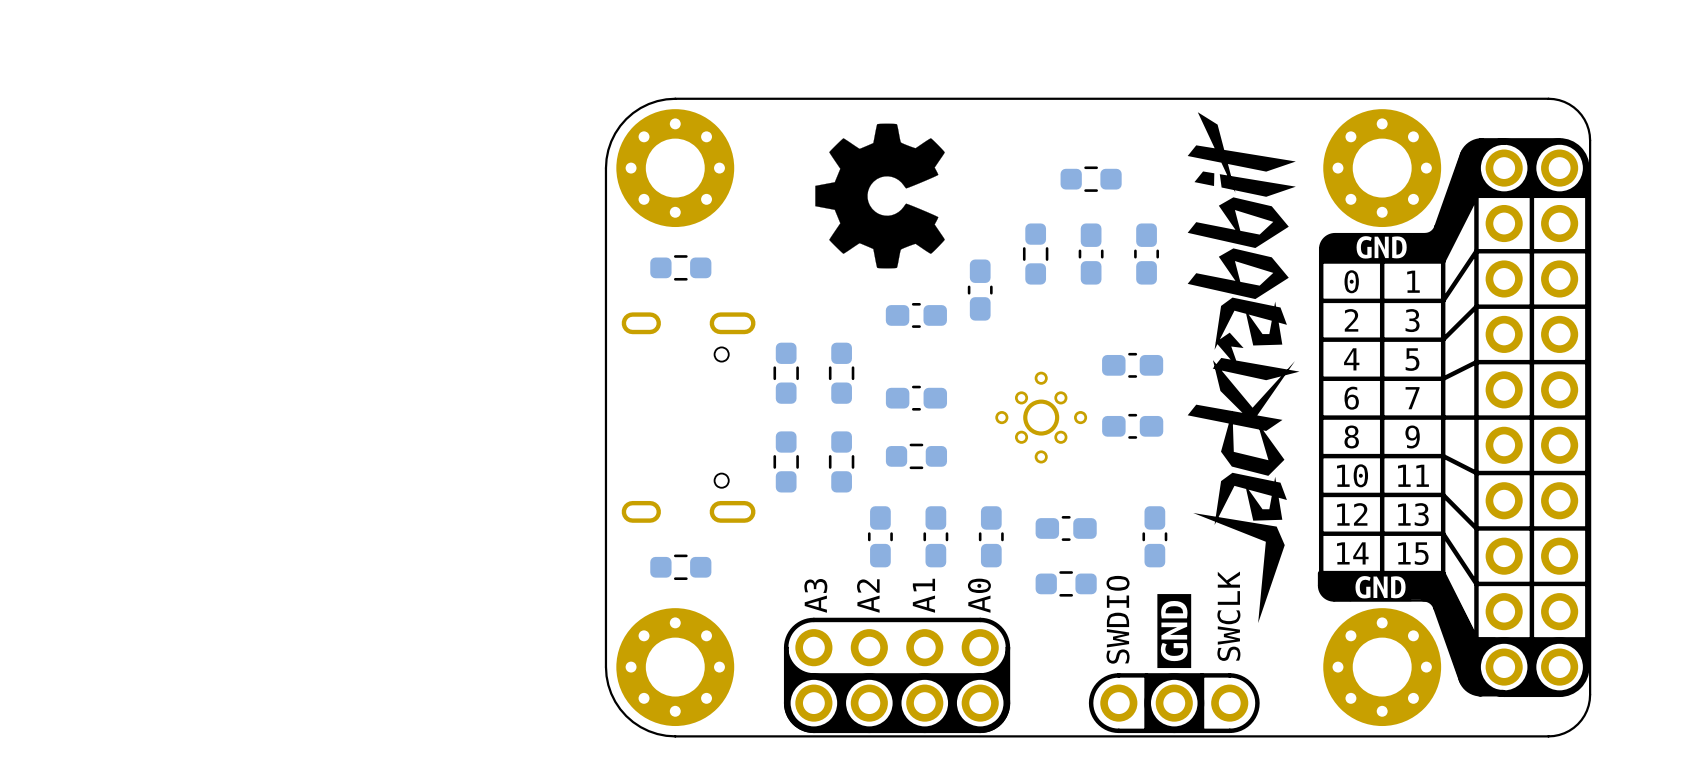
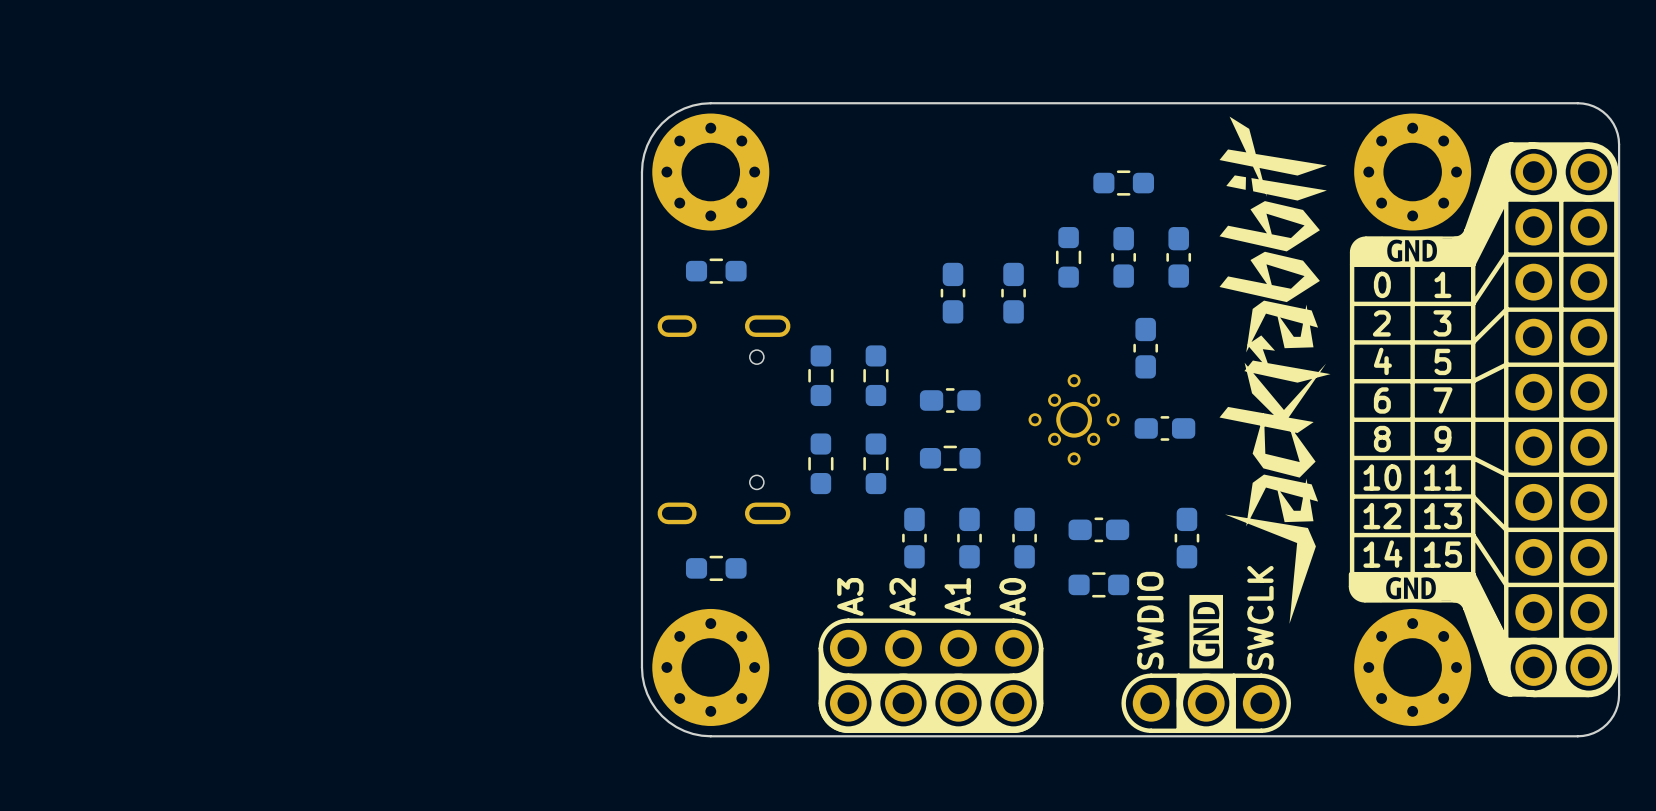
drawing: [815, 123, 945, 269] -> none
part rotation: 0° (916, 315) -> 90° clockwise (953, 293)
part rotation: 0° (1132, 365) -> 90° clockwise (1145, 348)

